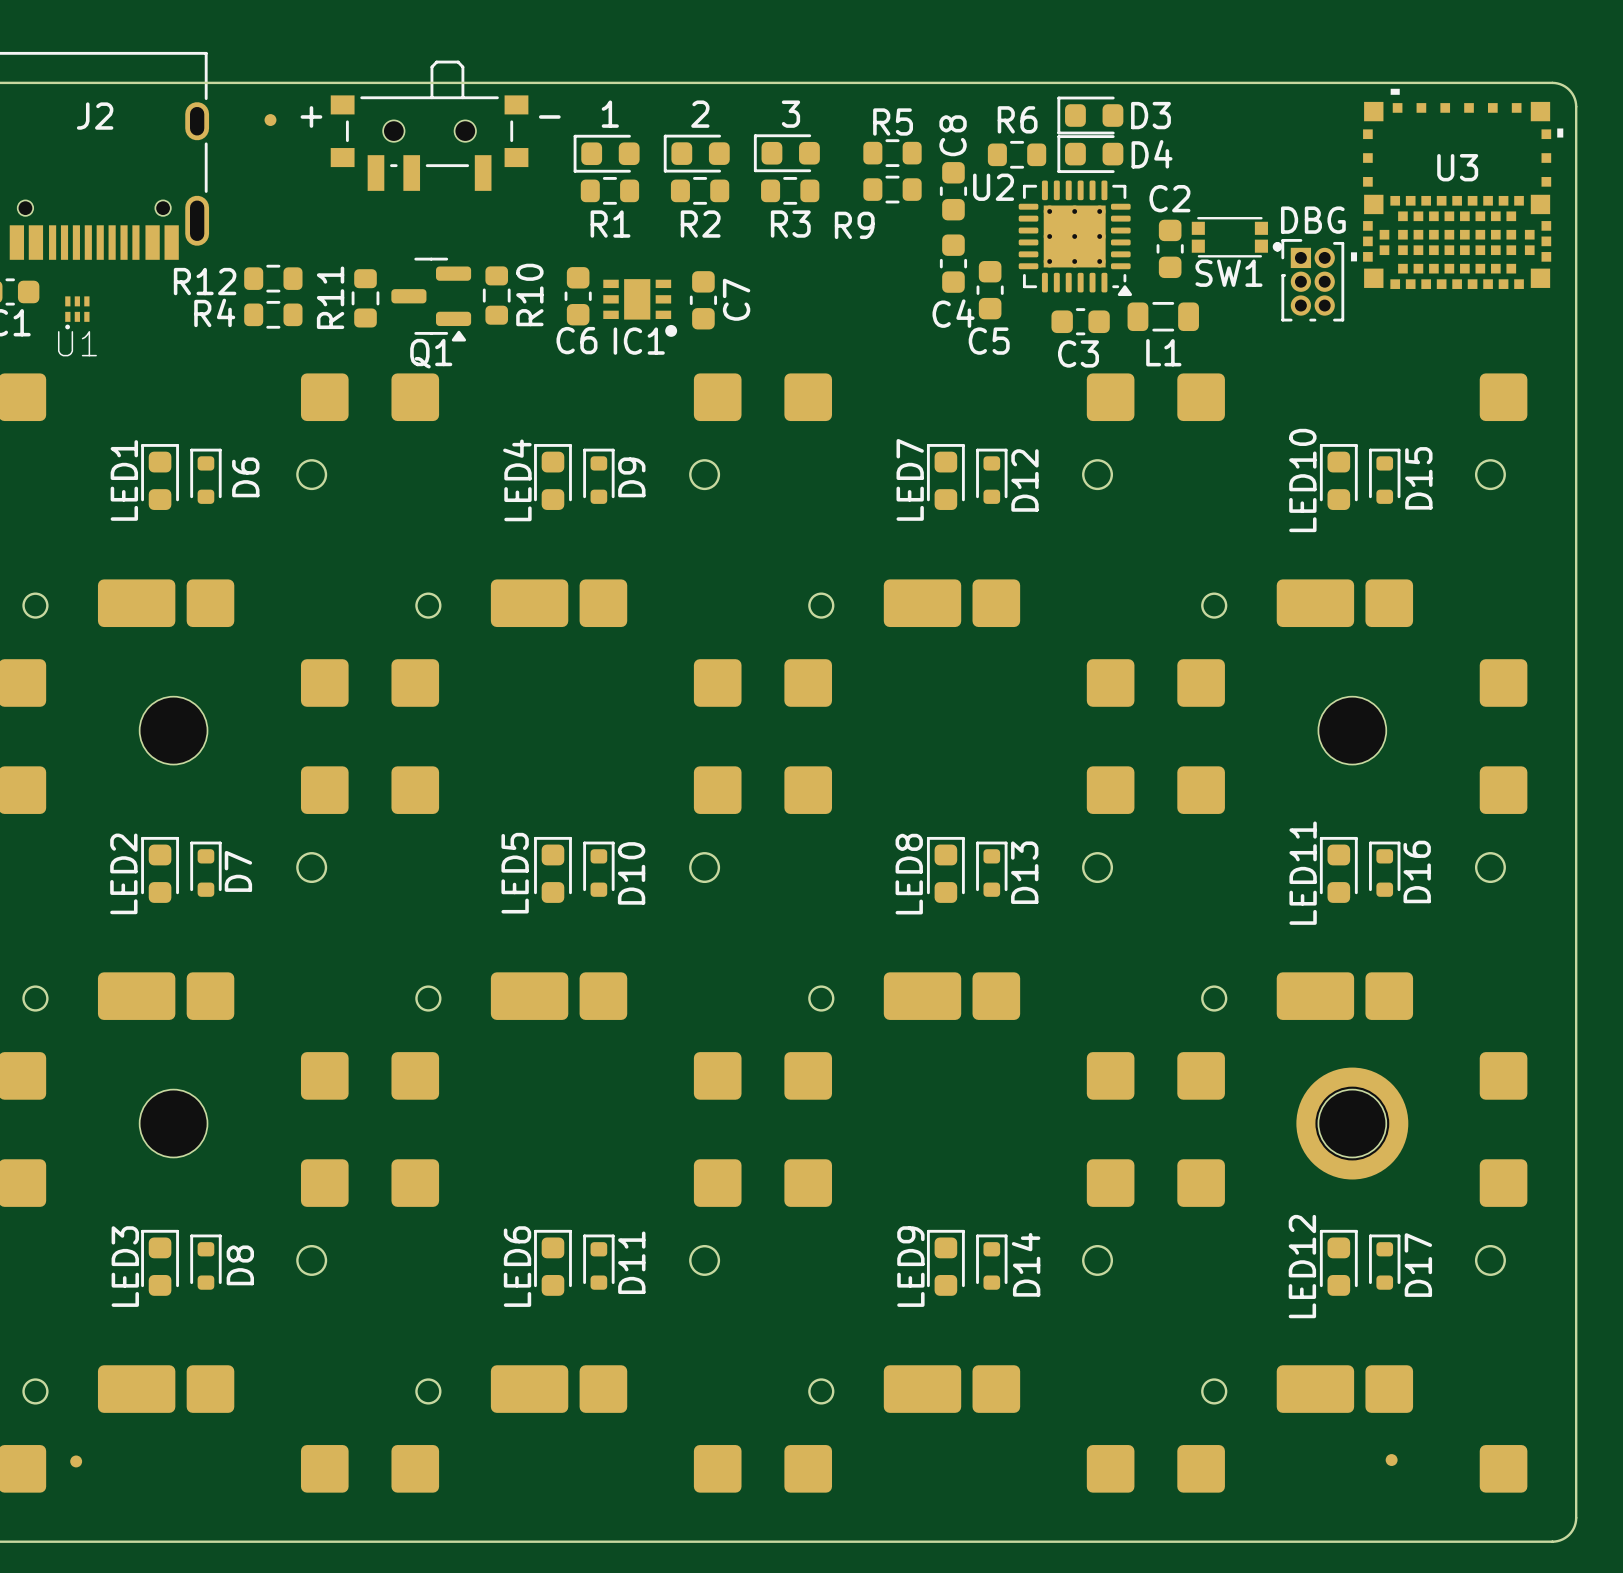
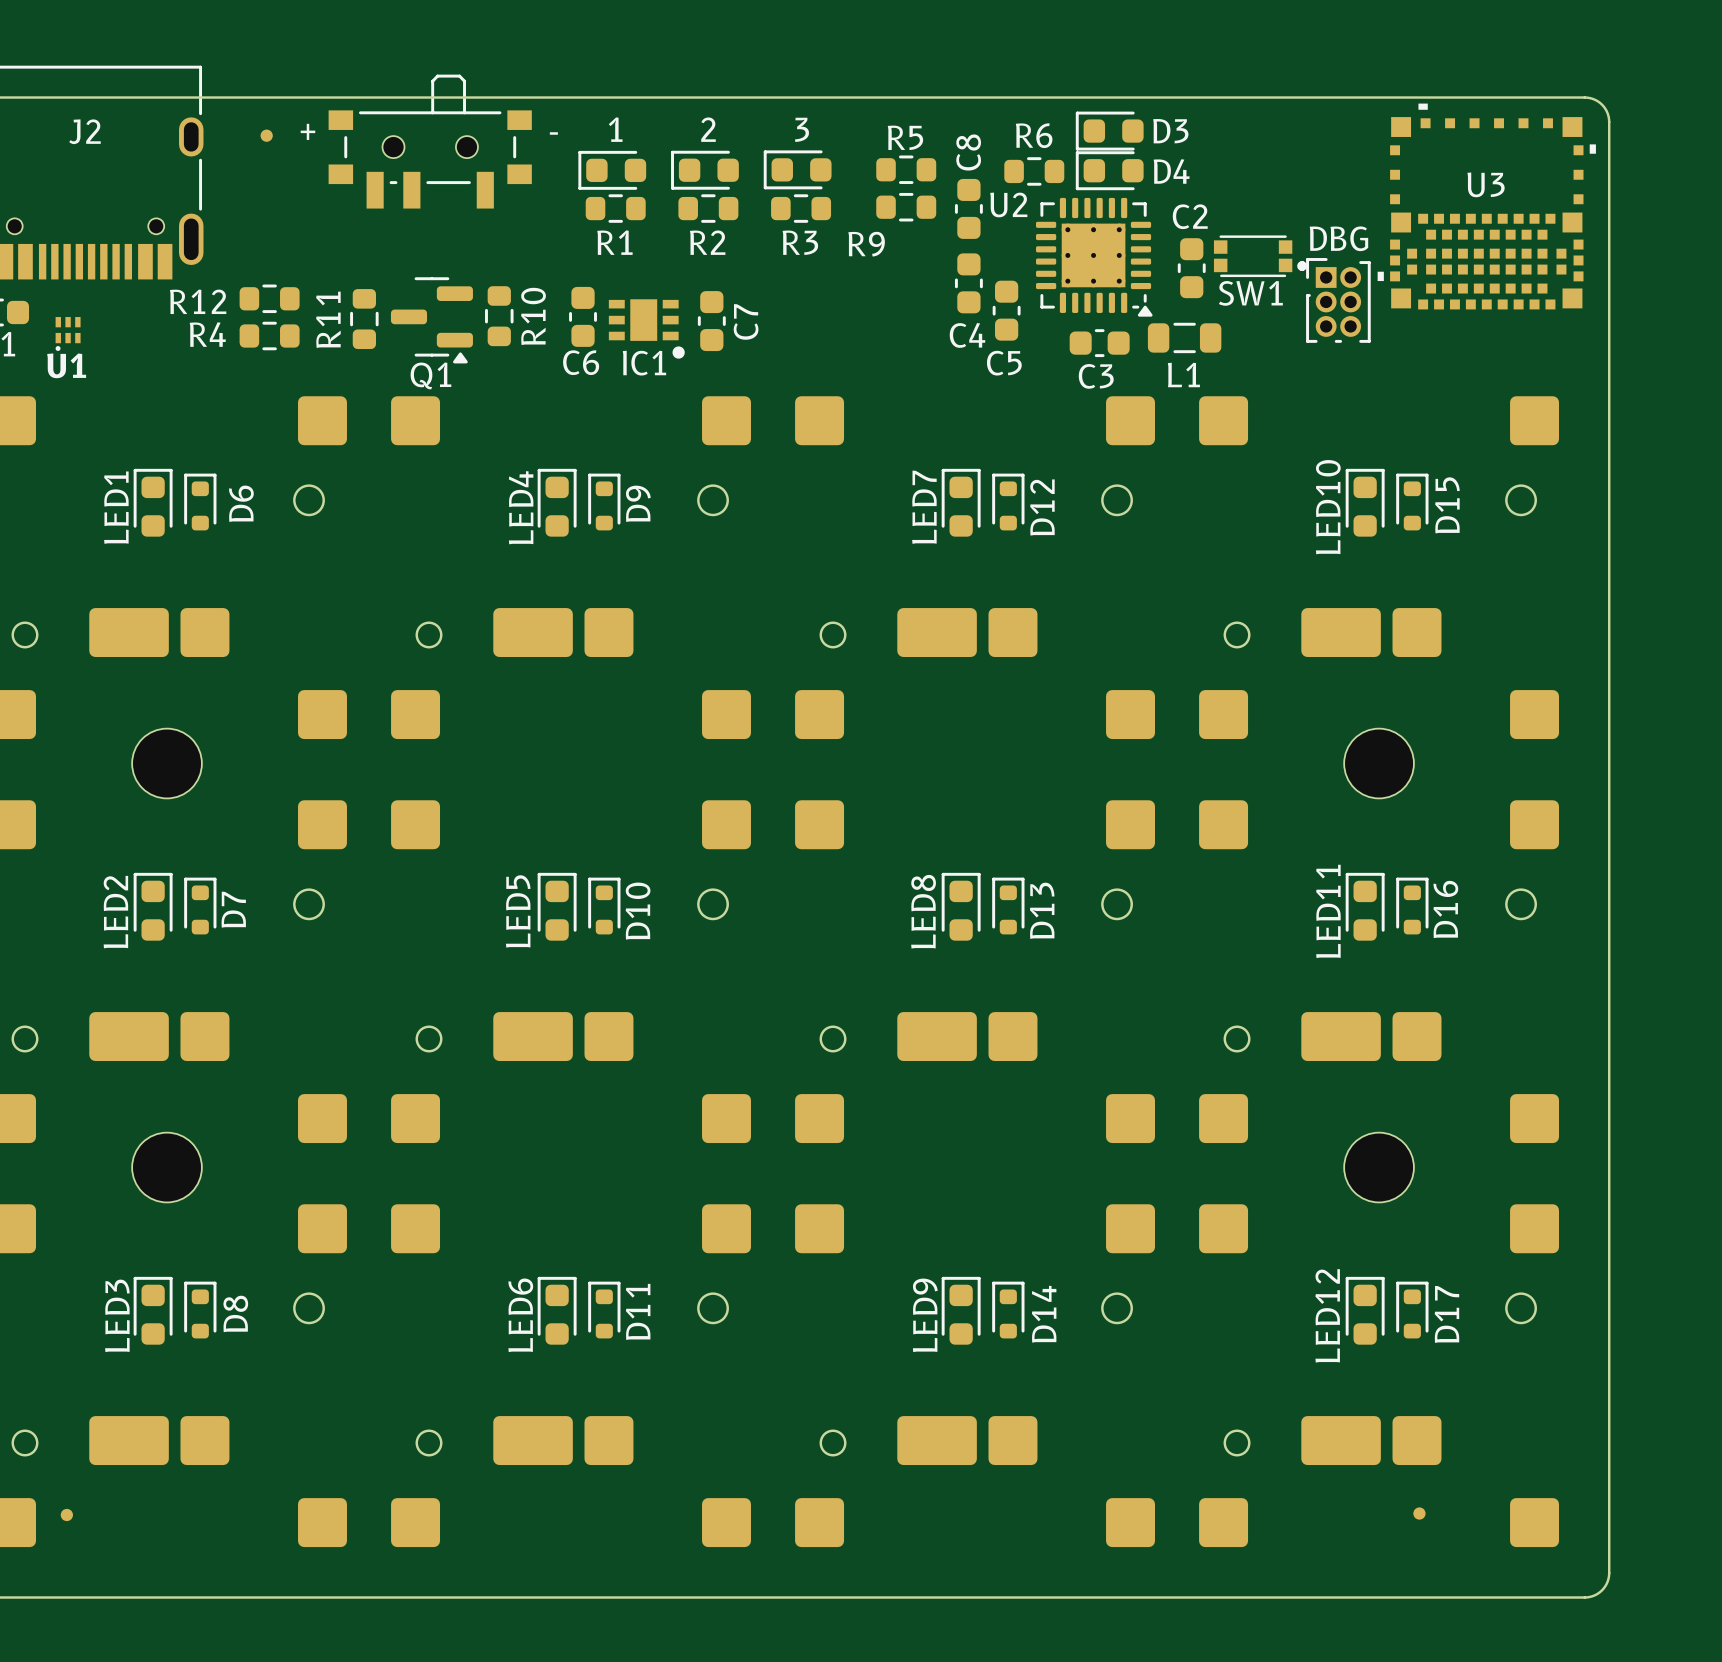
part: (1352, 1123) -> none

